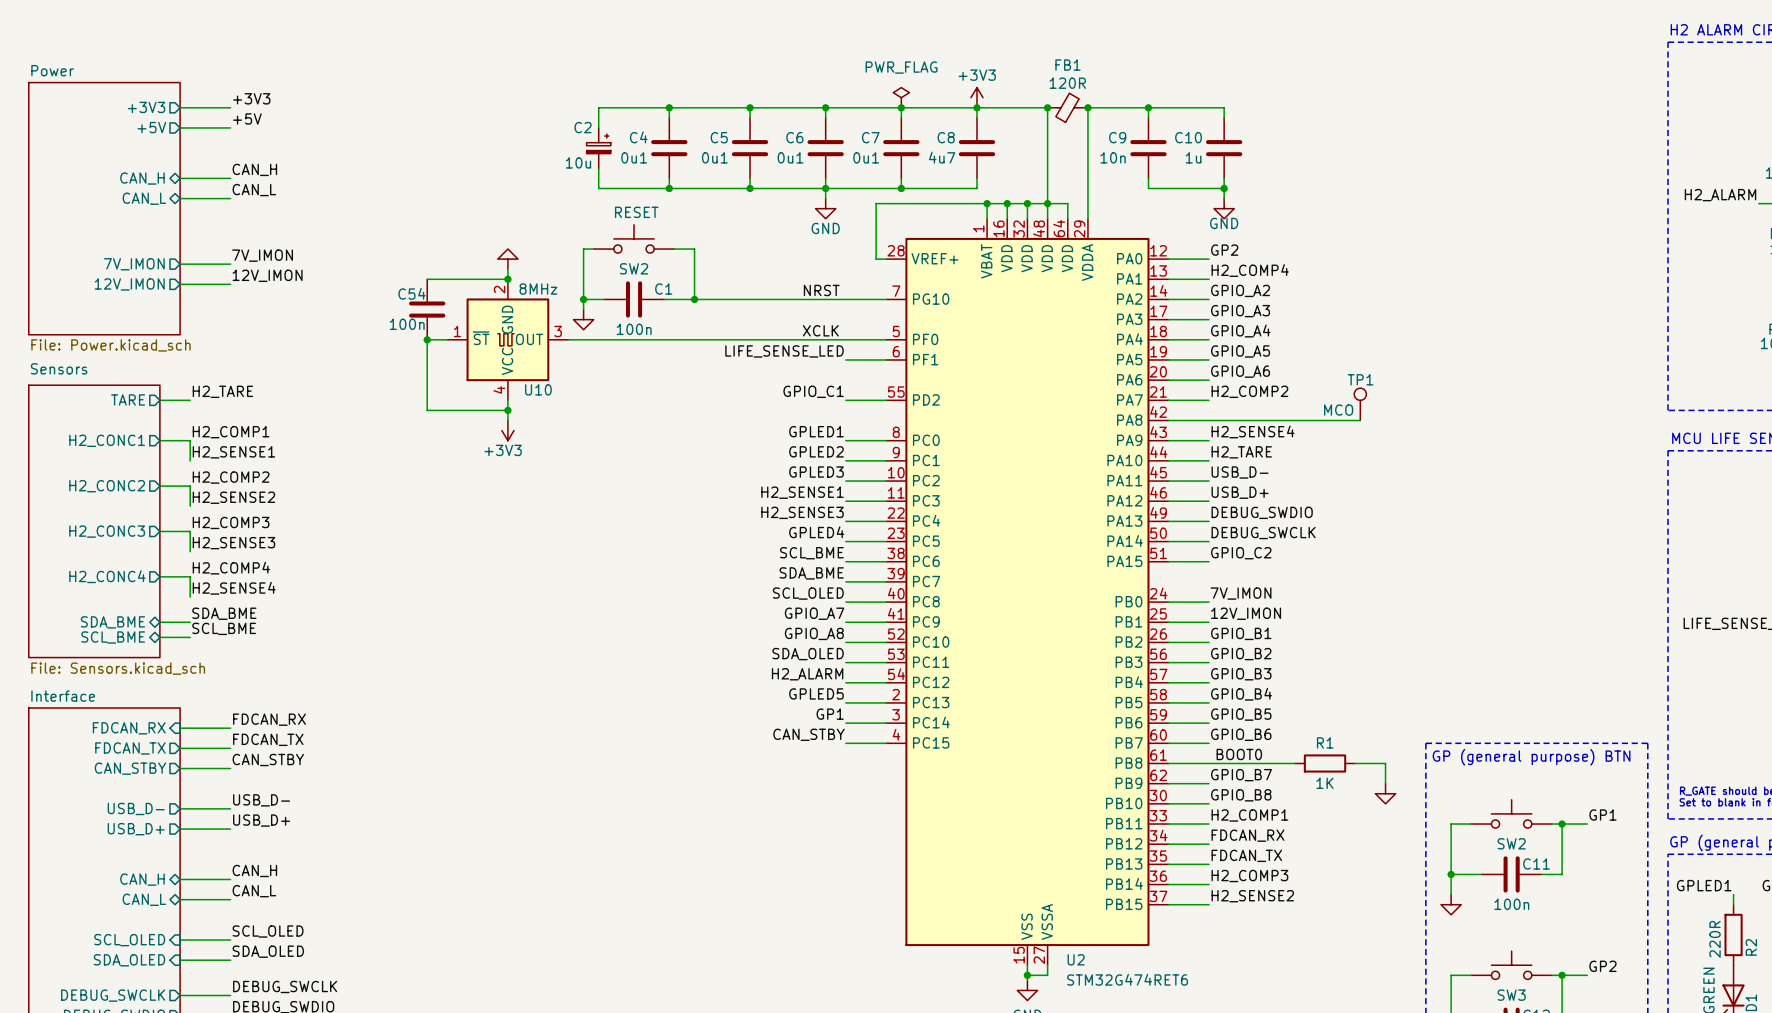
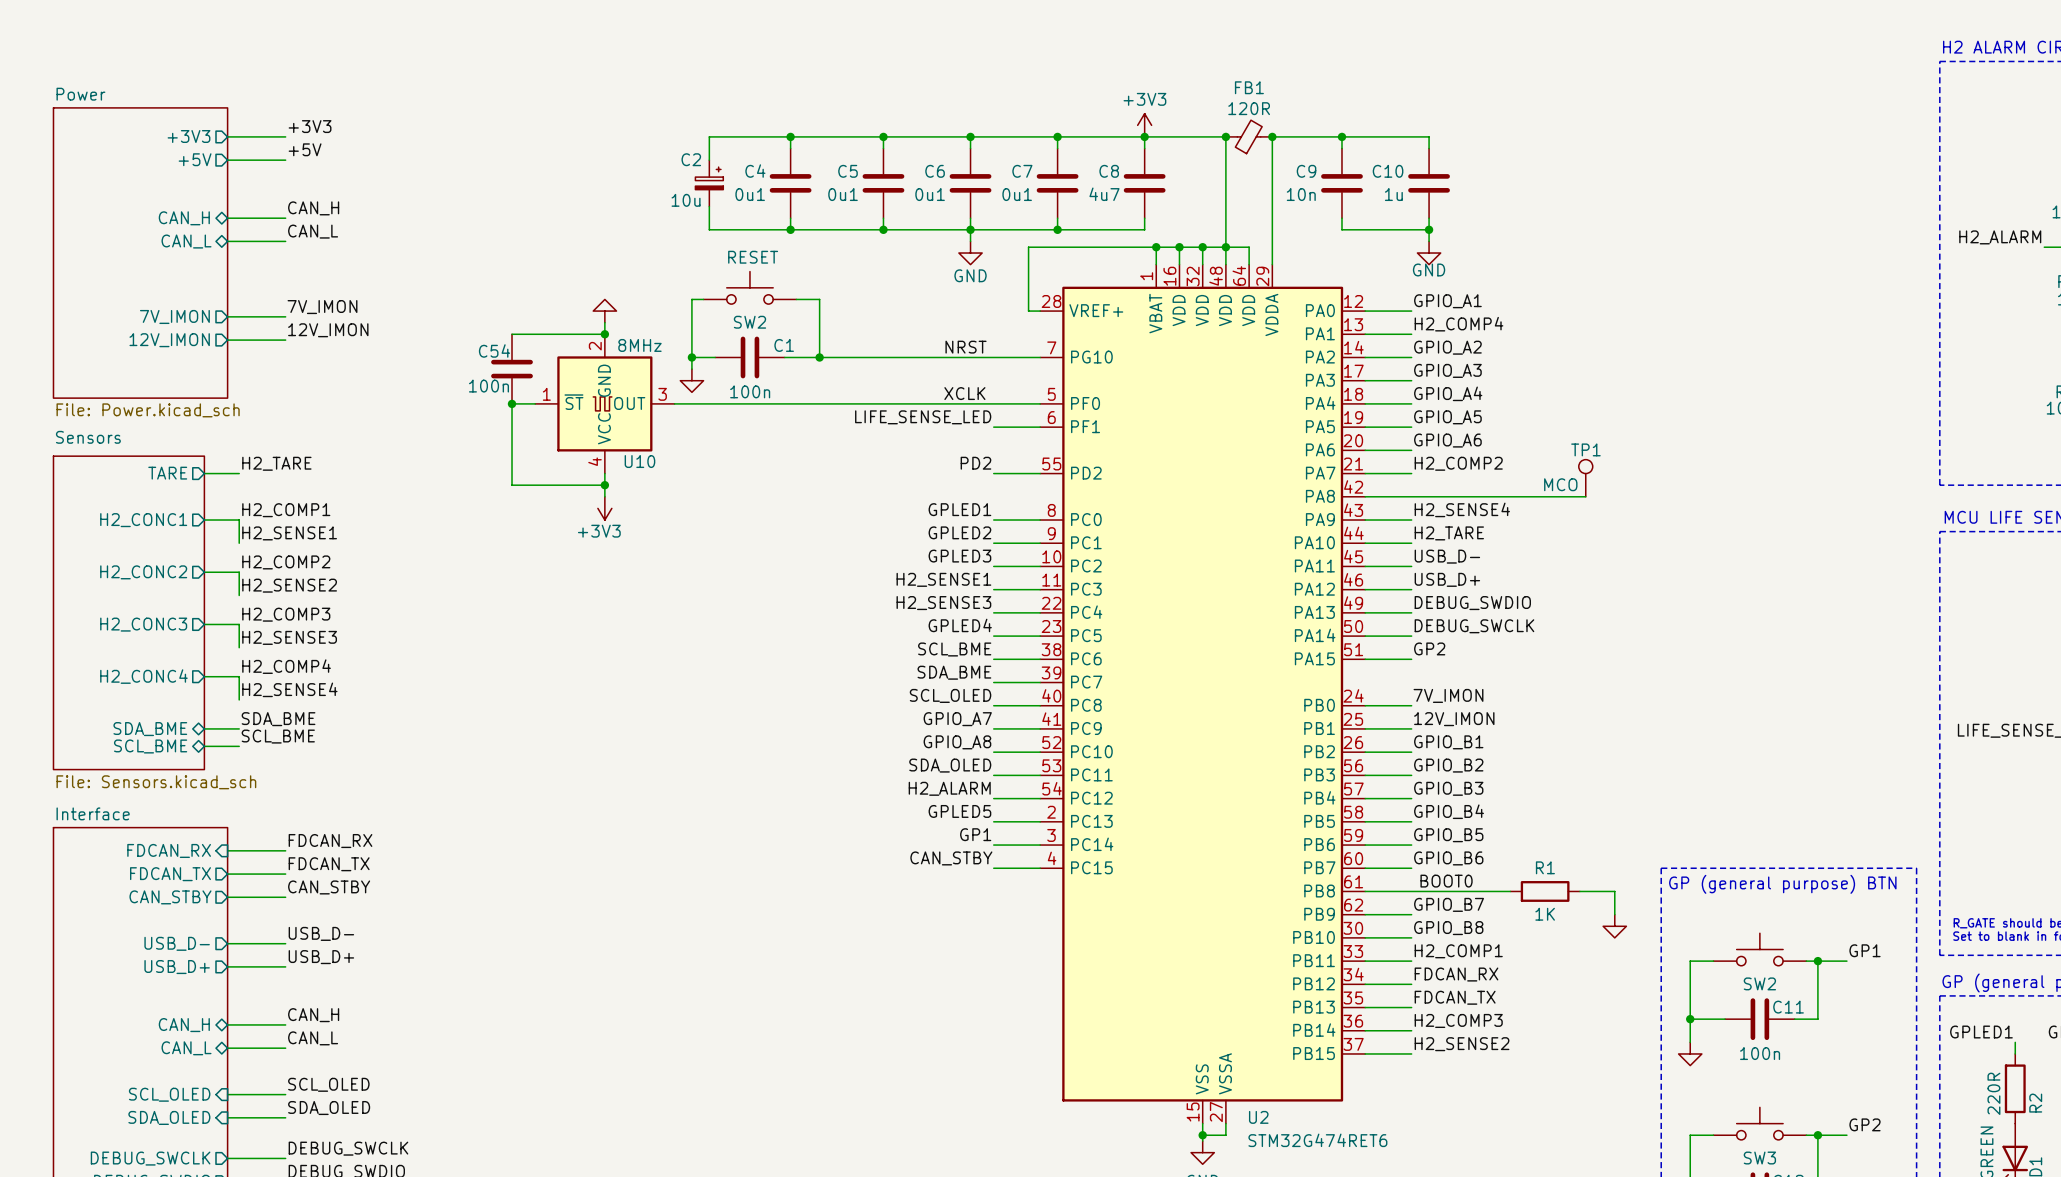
power symbol: PWR_FLAG (901, 97) -> none
label: GP2 (1224, 250) -> GPIO_A1 (1447, 301)
label: GPIO_C1 (813, 391) -> PD2 (975, 463)
label: GPIO_C2 (1241, 553) -> GP2 (1429, 648)

